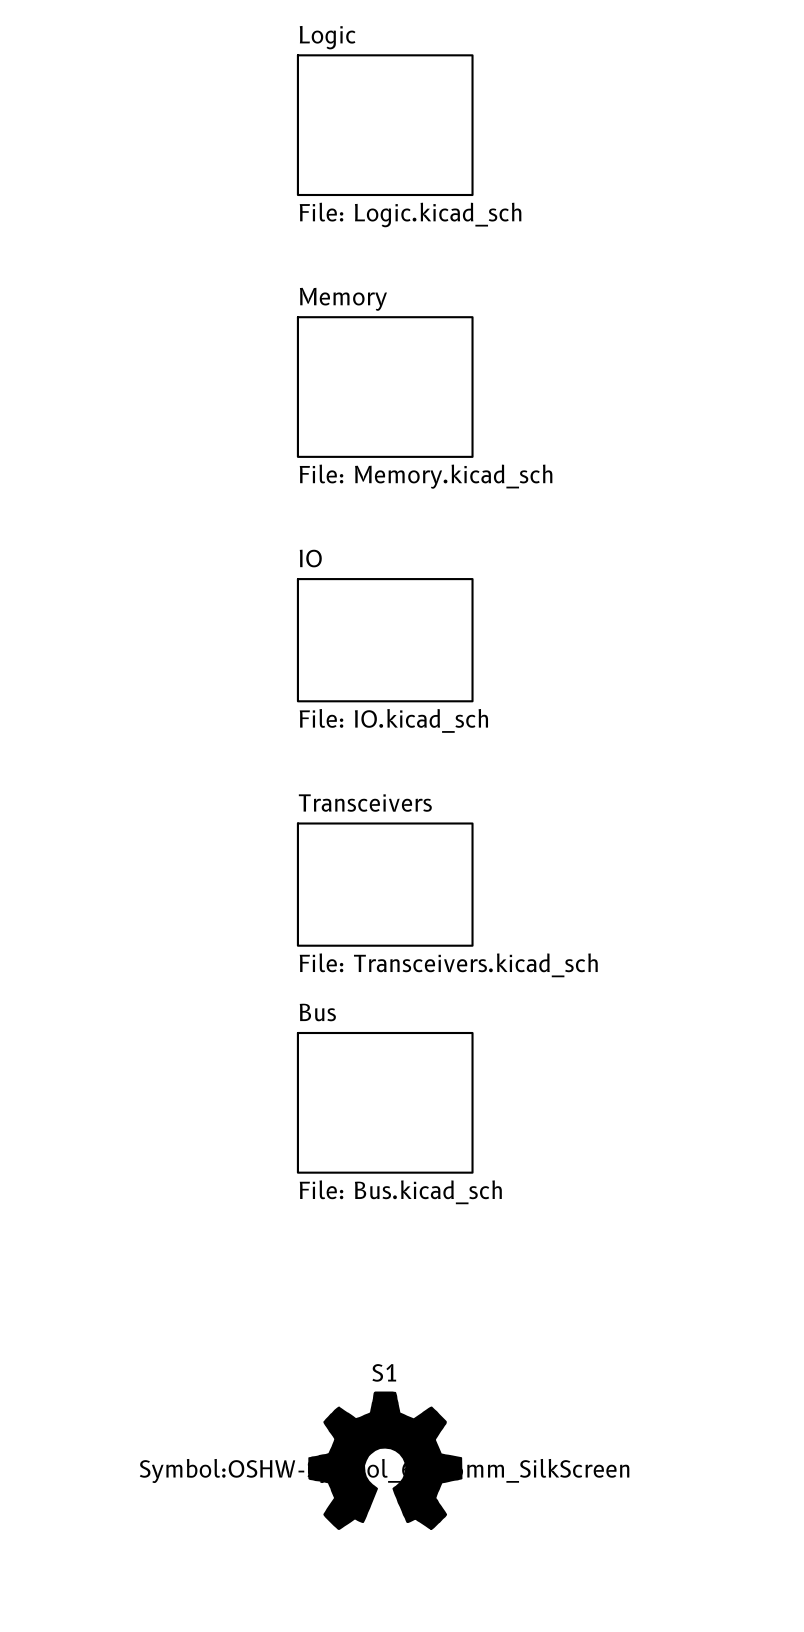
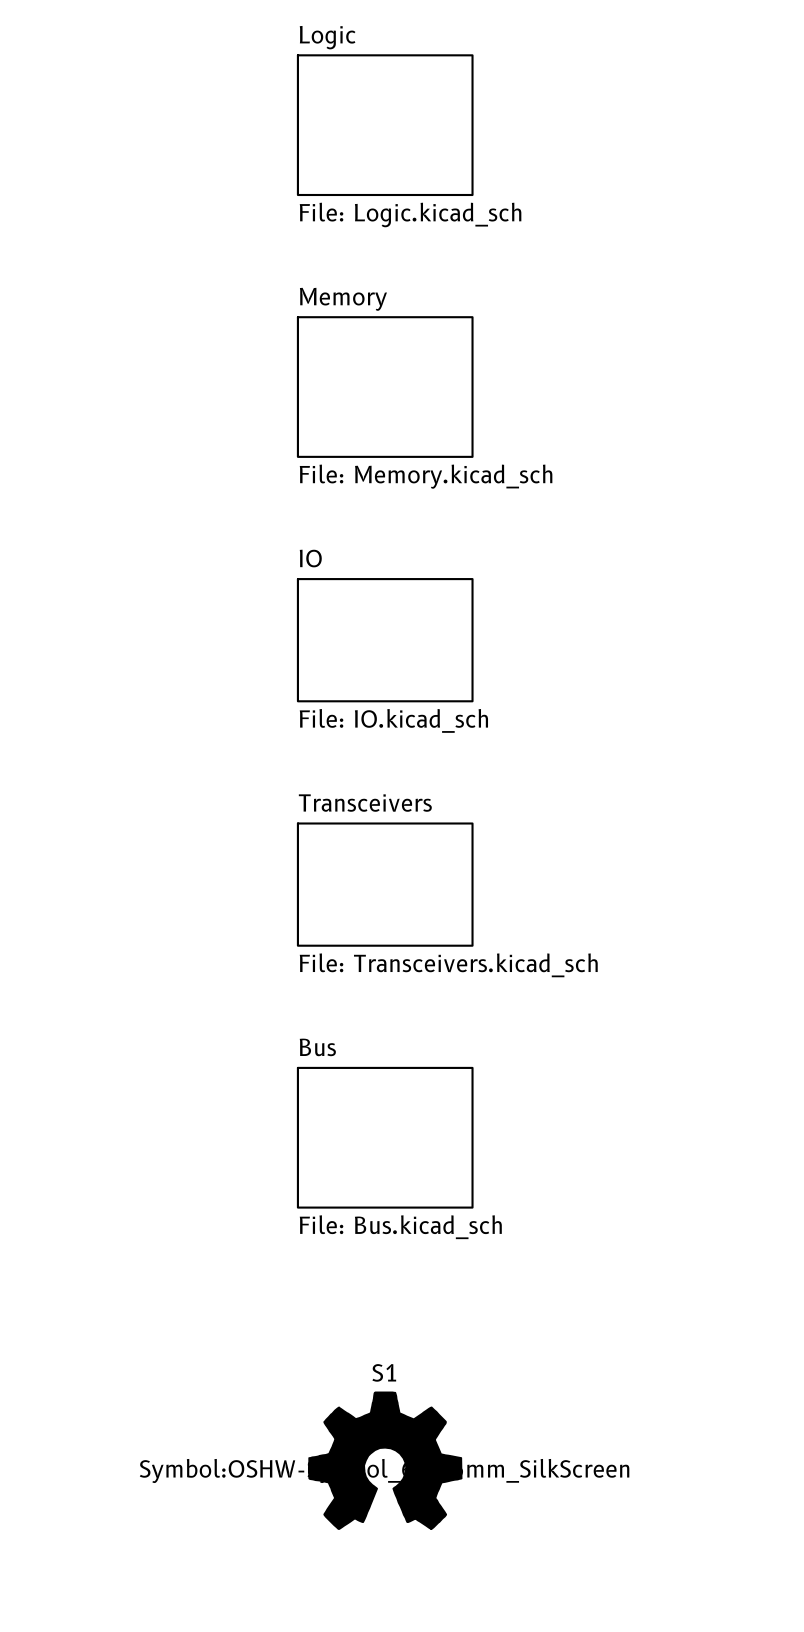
sheet Bus position: (385, 1102) -> (385, 1137)

